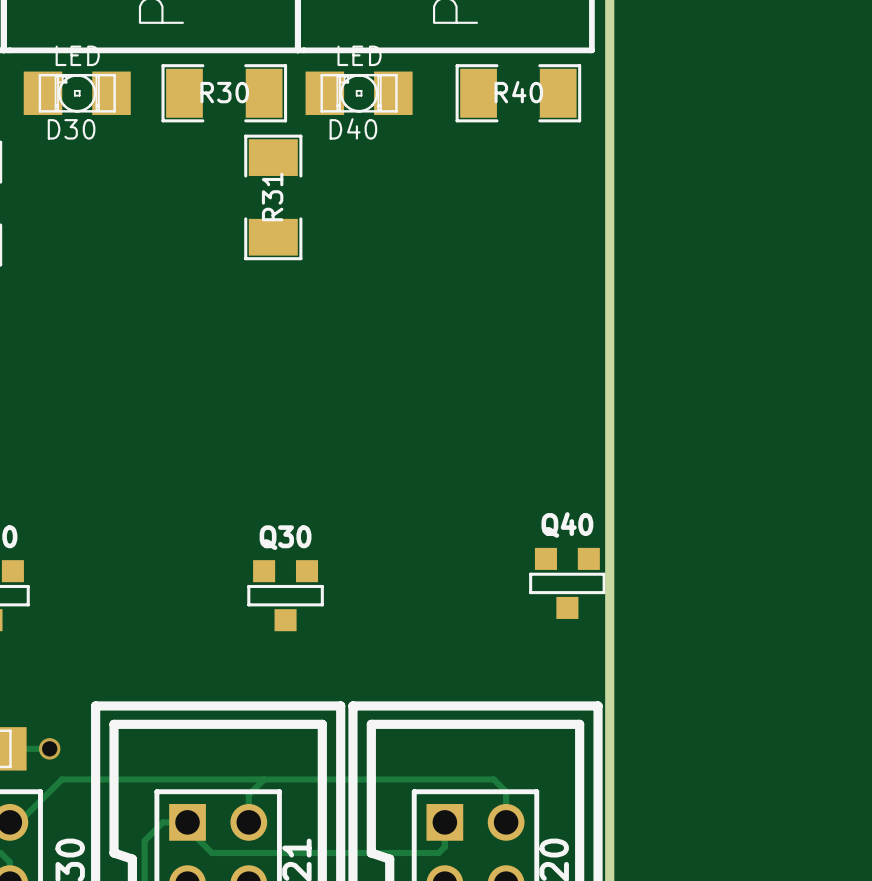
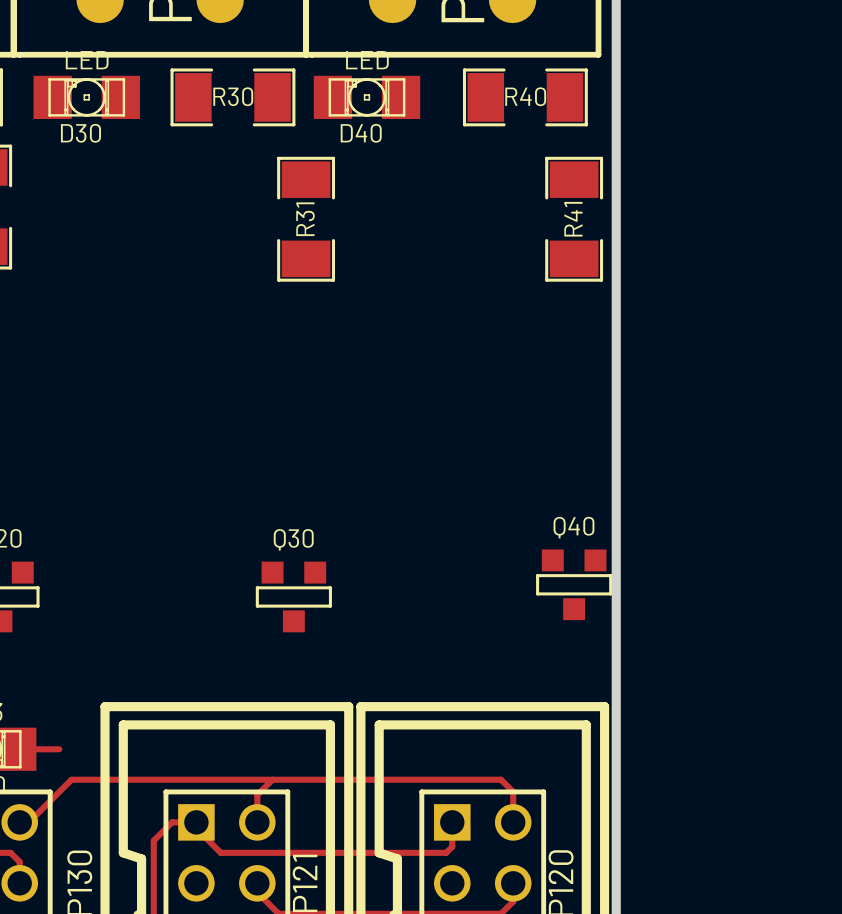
R31 position: (273, 197) -> (306, 219)
R41: none -> (574, 219)
via: (49, 748) -> none

